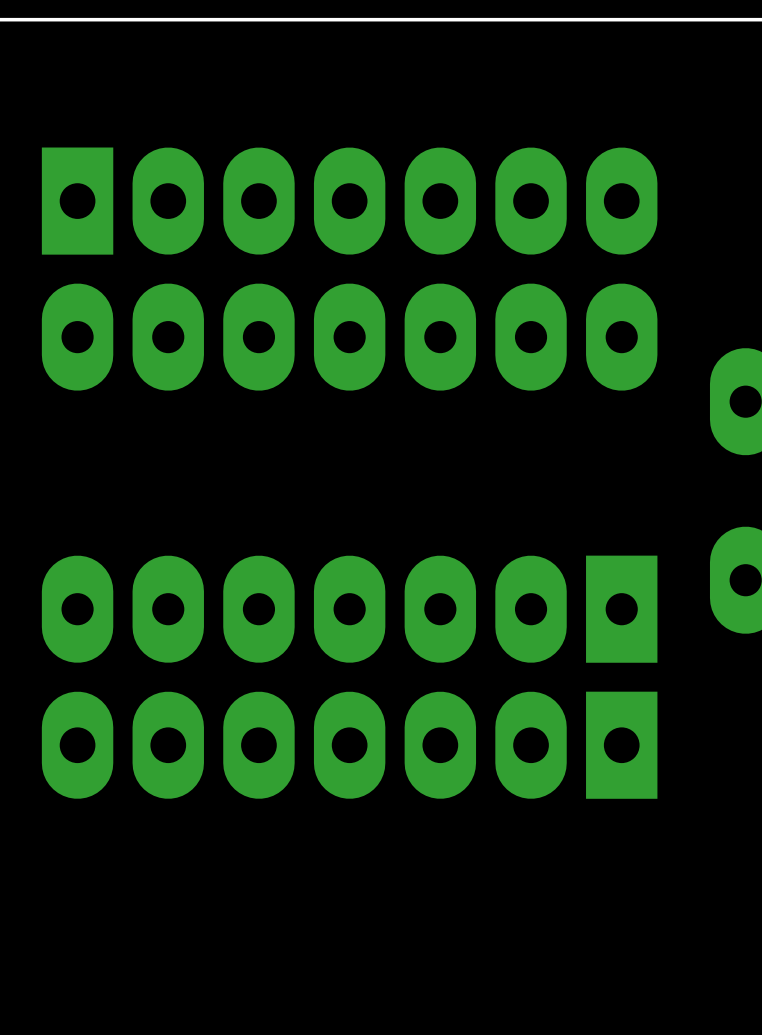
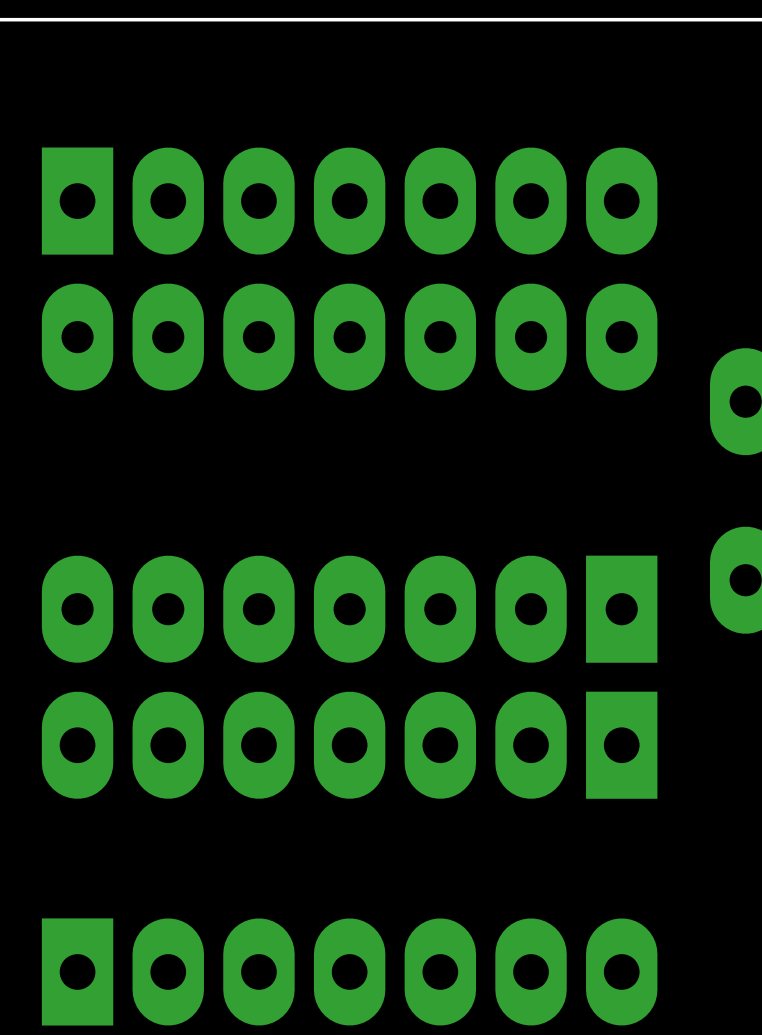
part: none -> (349, 971)

